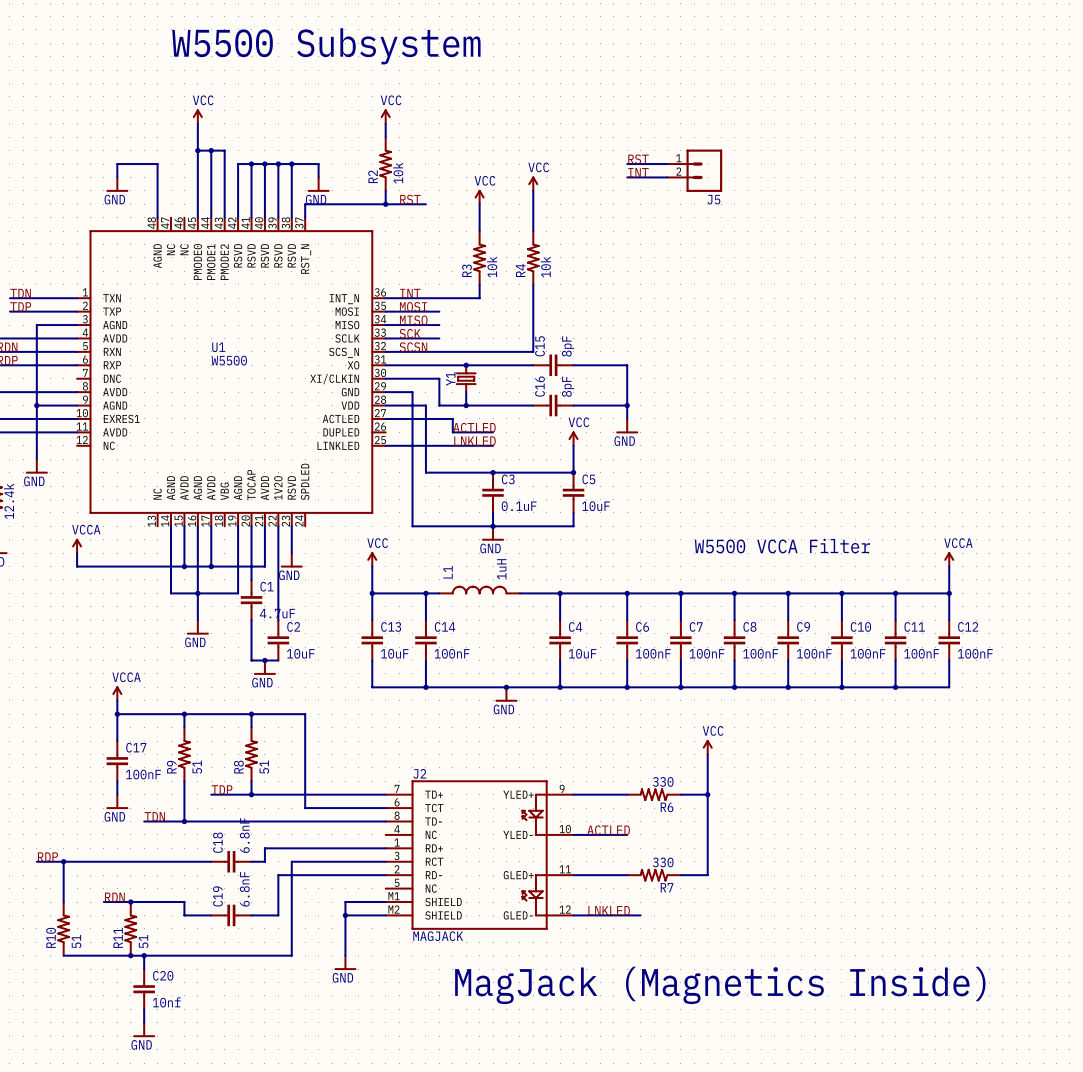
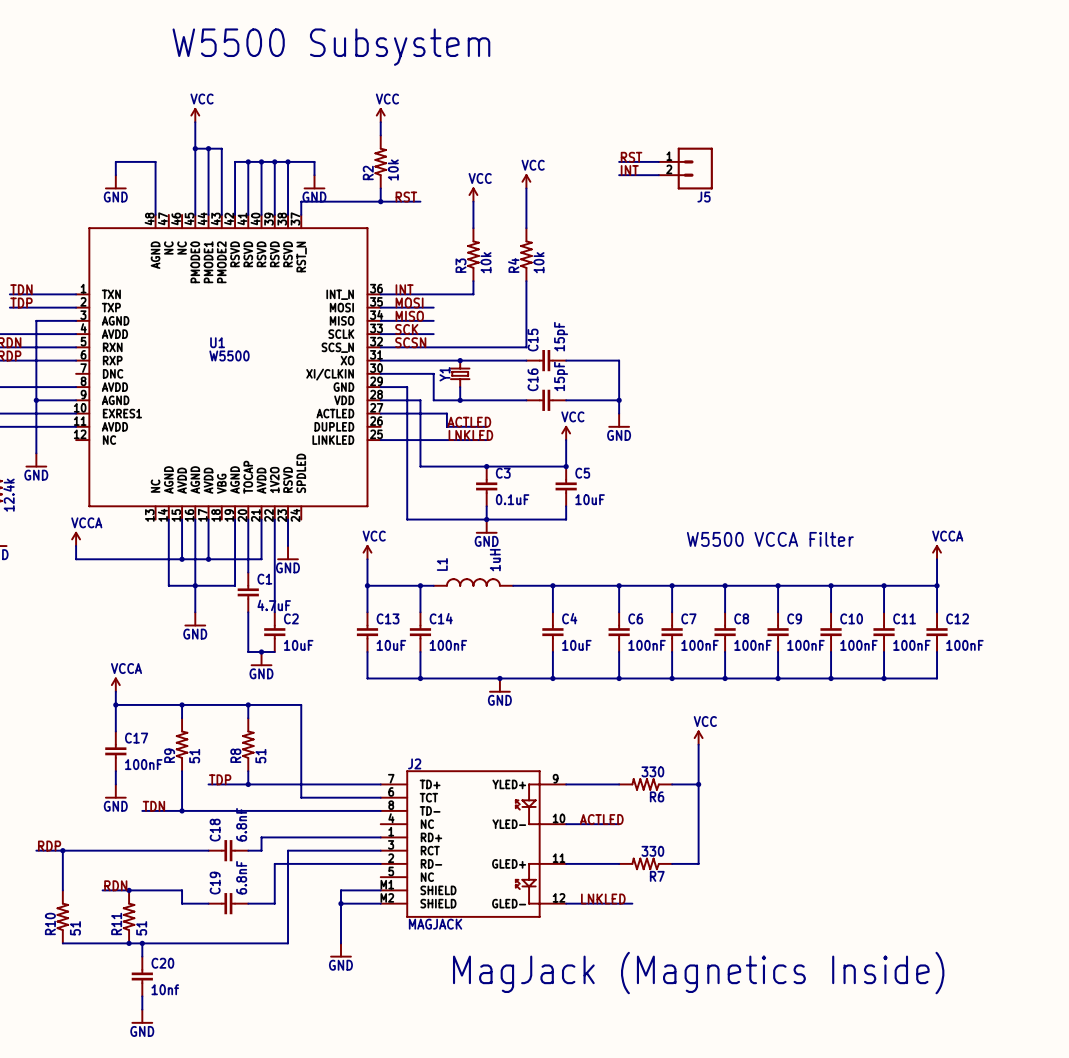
C15 value: 8pF (568, 346) -> 15pF (561, 336)
C16 value: 8pF (568, 386) -> 15pF (561, 376)

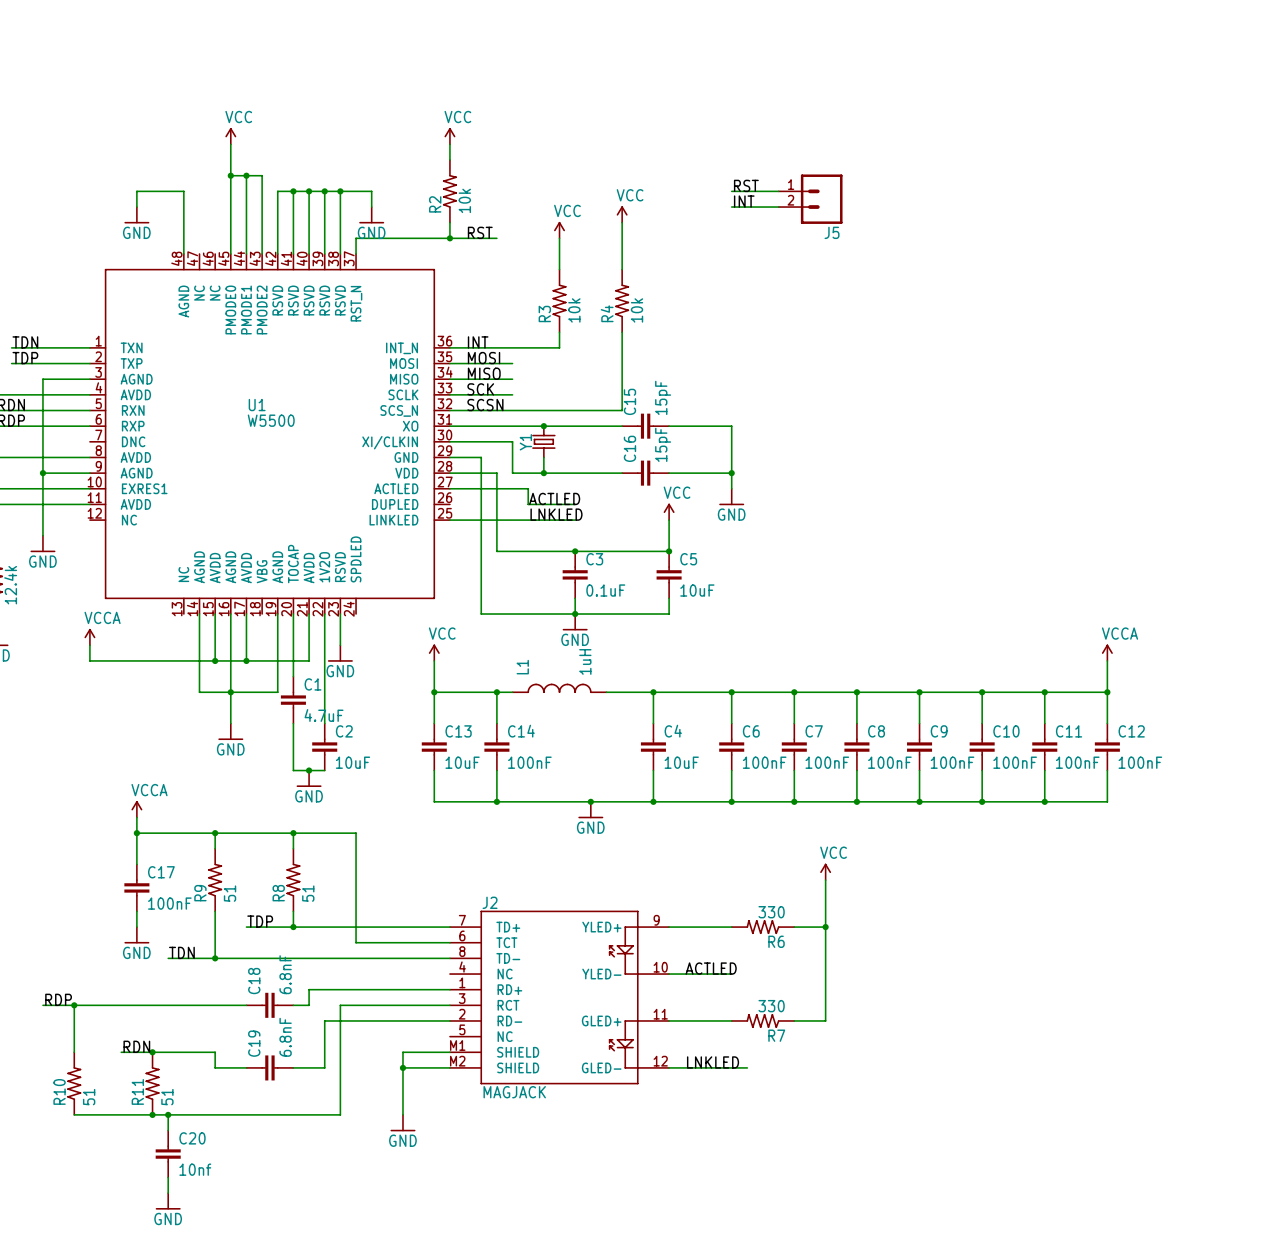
text: W5500 Subsystem (331, 47) -> none
text: W5500 VCCA Filter (770, 539) -> none
text: MagJack (Magnetics Inside) (698, 973) -> none

